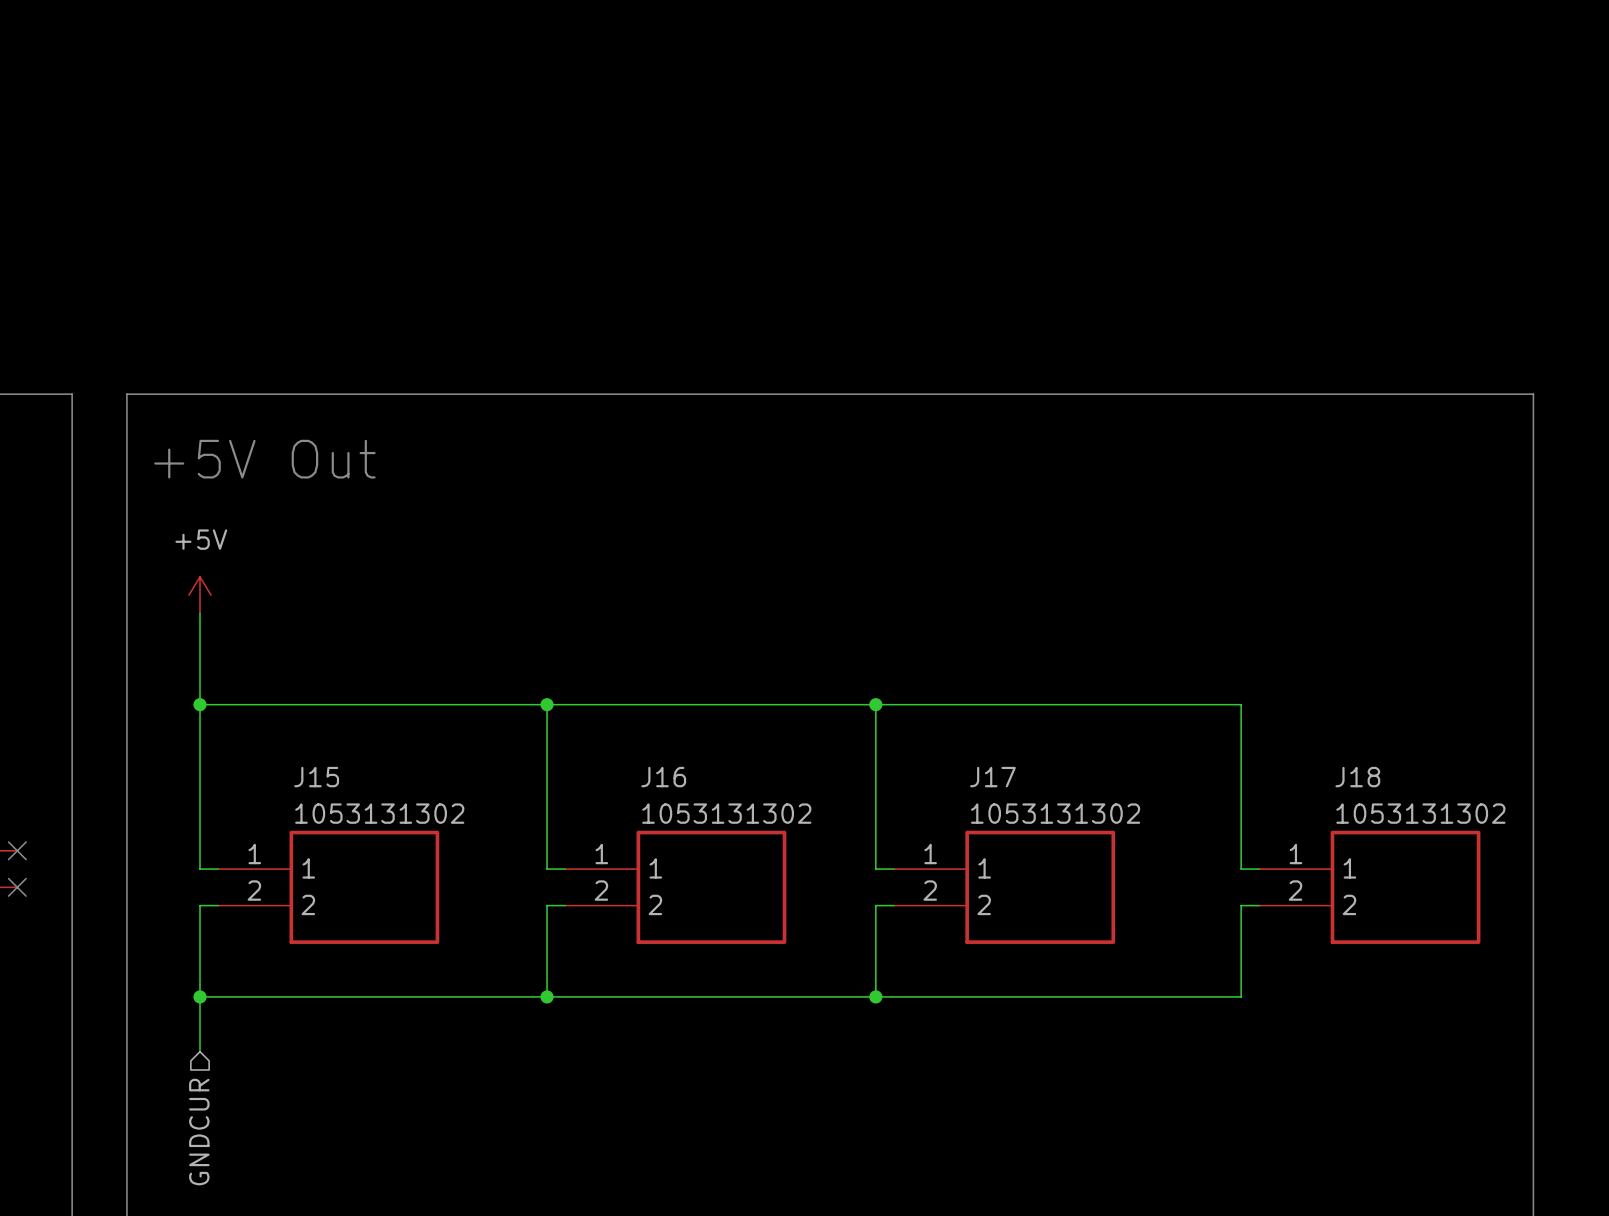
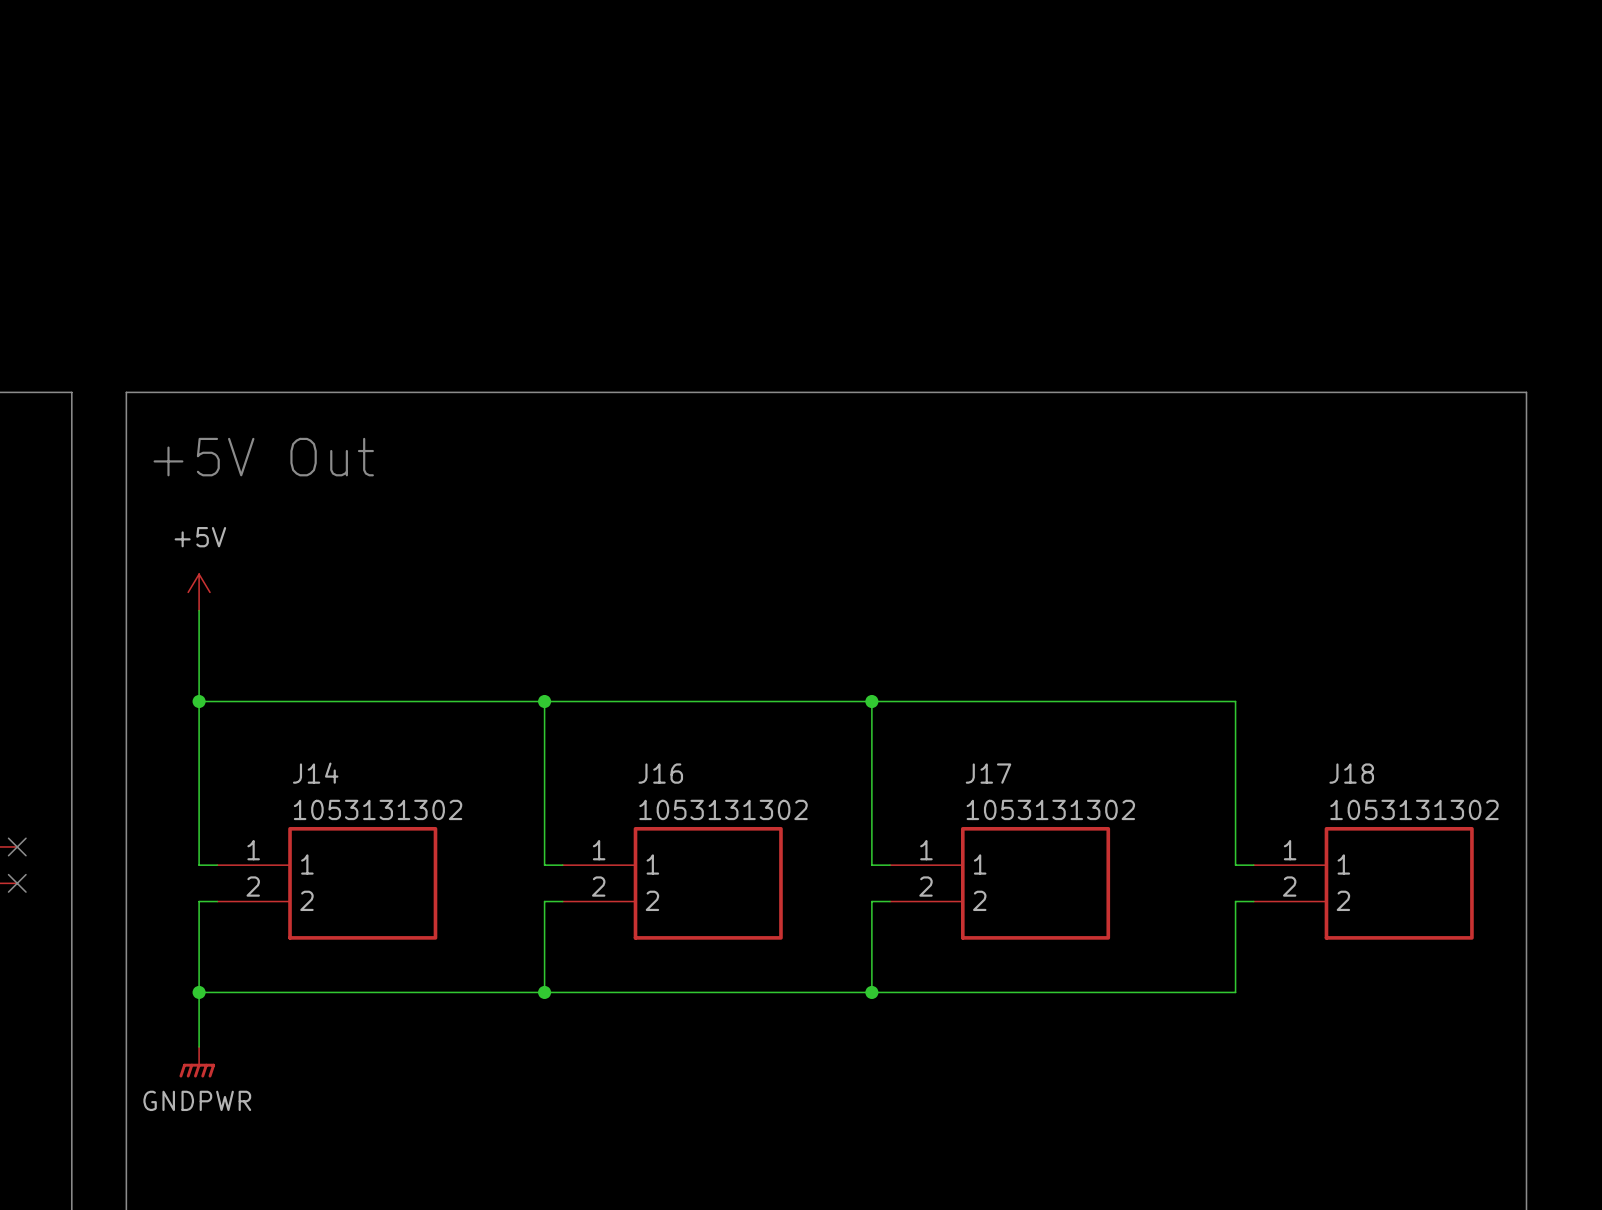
J15 name: J15 (316, 777) -> J14 (315, 773)
power symbol: none -> GNDPWR (197, 1062)
hierarchical label: GNDCUR (199, 1132) -> none

